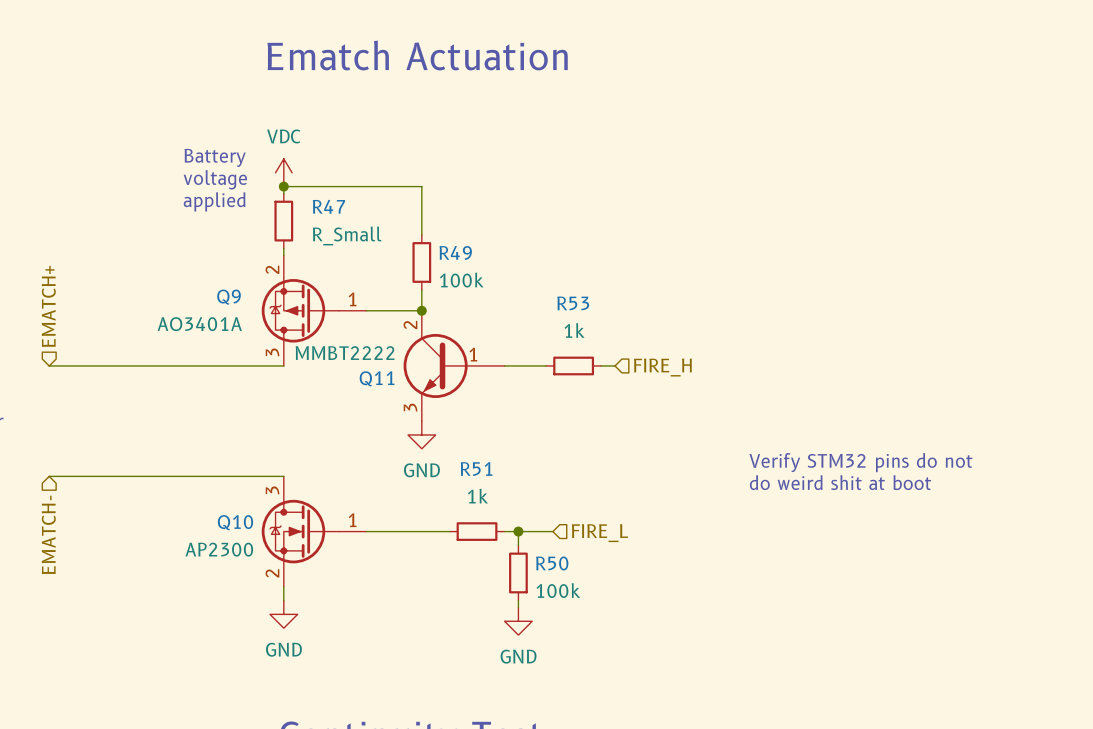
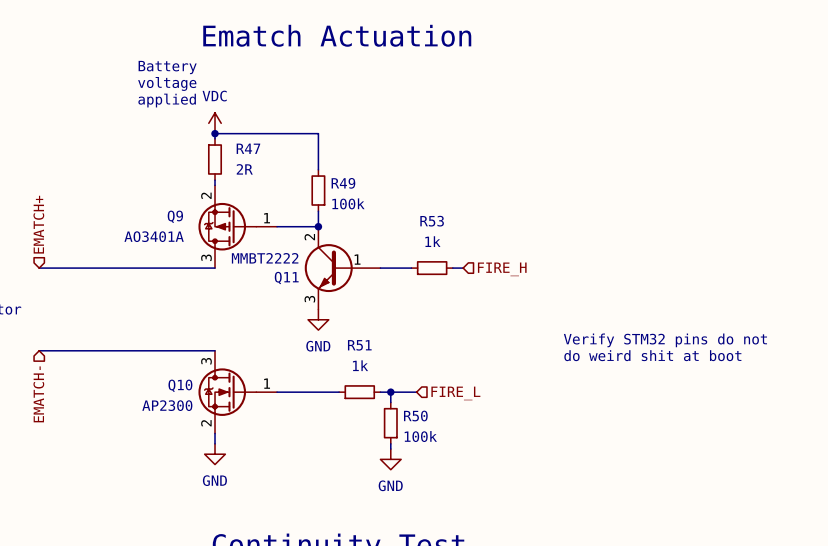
text position: Battery (215, 157) -> Battery (167, 67)
text position: voltage (215, 179) -> voltage (167, 83)
text position: applied (214, 201) -> applied (167, 100)
R47 value: R_Small (347, 235) -> 2R (244, 169)

